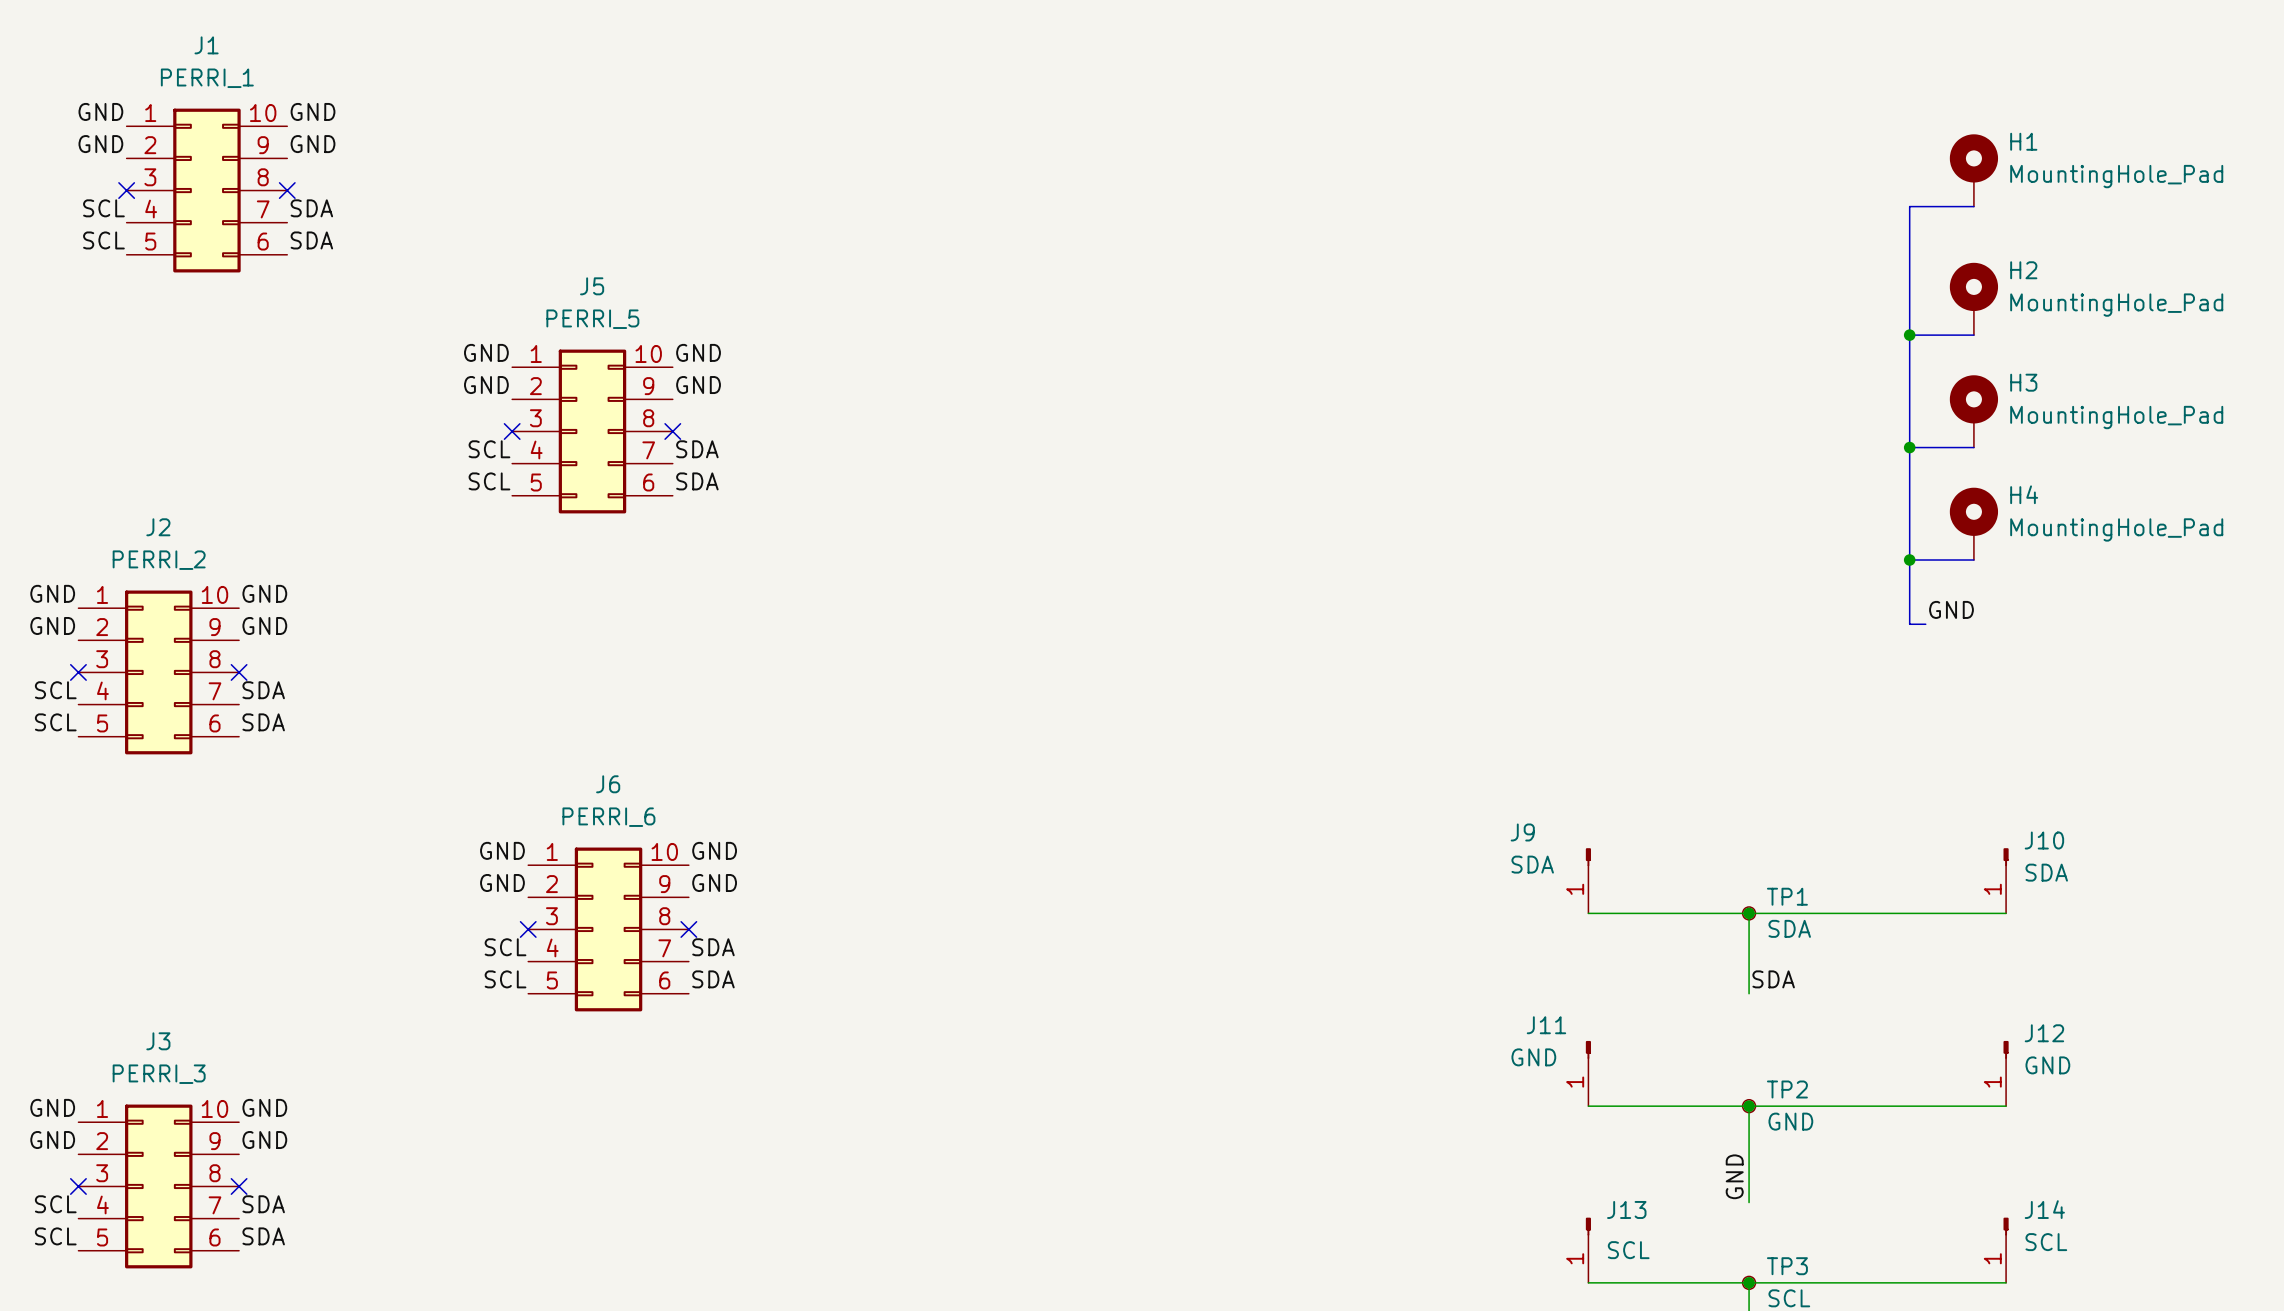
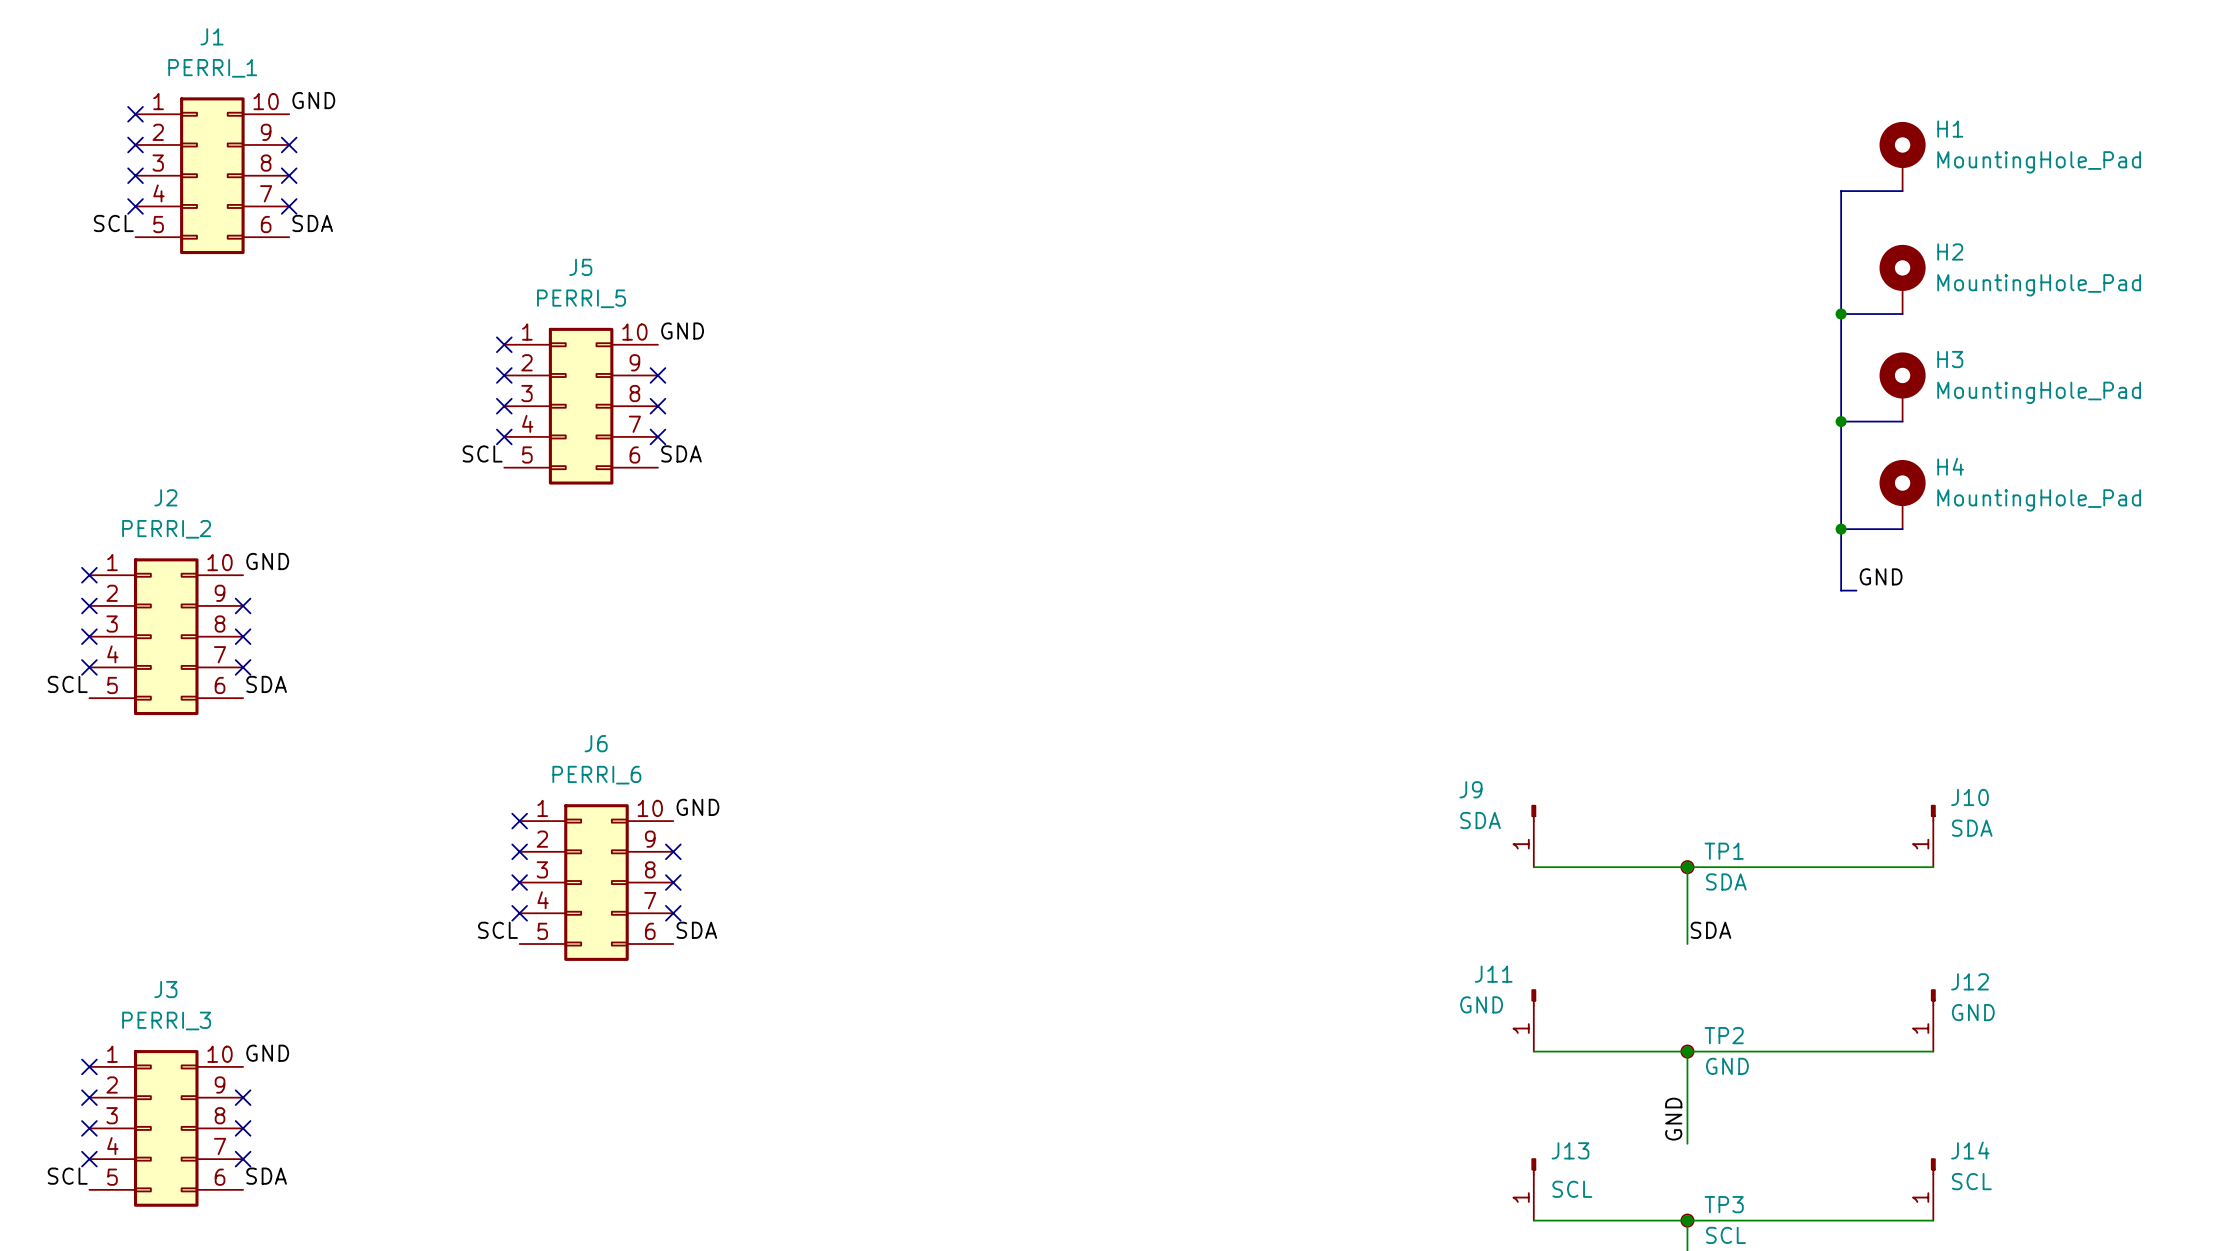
label: GND (100, 111) -> none
no-connect mark: none -> (135, 114)
label: GND (100, 144) -> none
label: GND (313, 144) -> none
no-connect mark: none -> (135, 144)
no-connect mark: none -> (289, 144)
label: SCL (103, 208) -> none
label: SDA (311, 208) -> none
no-connect mark: none -> (135, 206)
no-connect mark: none -> (289, 206)
label: GND (486, 352) -> none
no-connect mark: none -> (504, 344)
label: GND (486, 385) -> none
label: GND (698, 385) -> none
no-connect mark: none -> (504, 375)
no-connect mark: none -> (657, 375)
label: SCL (489, 449) -> none
label: SDA (697, 449) -> none
no-connect mark: none -> (504, 436)
no-connect mark: none -> (657, 436)
label: GND (52, 593) -> none
no-connect mark: none -> (89, 575)
label: GND (52, 625) -> none
label: GND (264, 625) -> none
no-connect mark: none -> (89, 605)
no-connect mark: none -> (243, 605)
label: SCL (55, 690) -> none
label: SDA (263, 690) -> none
no-connect mark: none -> (89, 667)
no-connect mark: none -> (243, 667)
label: GND (502, 850) -> none
no-connect mark: none -> (519, 821)
label: GND (502, 883) -> none
label: GND (714, 883) -> none
no-connect mark: none -> (519, 851)
no-connect mark: none -> (673, 851)
label: SCL (505, 947) -> none
label: SDA (713, 947) -> none
no-connect mark: none -> (519, 913)
no-connect mark: none -> (673, 913)
label: GND (52, 1107) -> none
no-connect mark: none -> (89, 1066)
label: GND (52, 1140) -> none
label: GND (264, 1140) -> none
no-connect mark: none -> (89, 1097)
no-connect mark: none -> (243, 1097)
label: SCL (55, 1204) -> none
label: SDA (263, 1204) -> none
no-connect mark: none -> (89, 1159)
no-connect mark: none -> (243, 1159)

